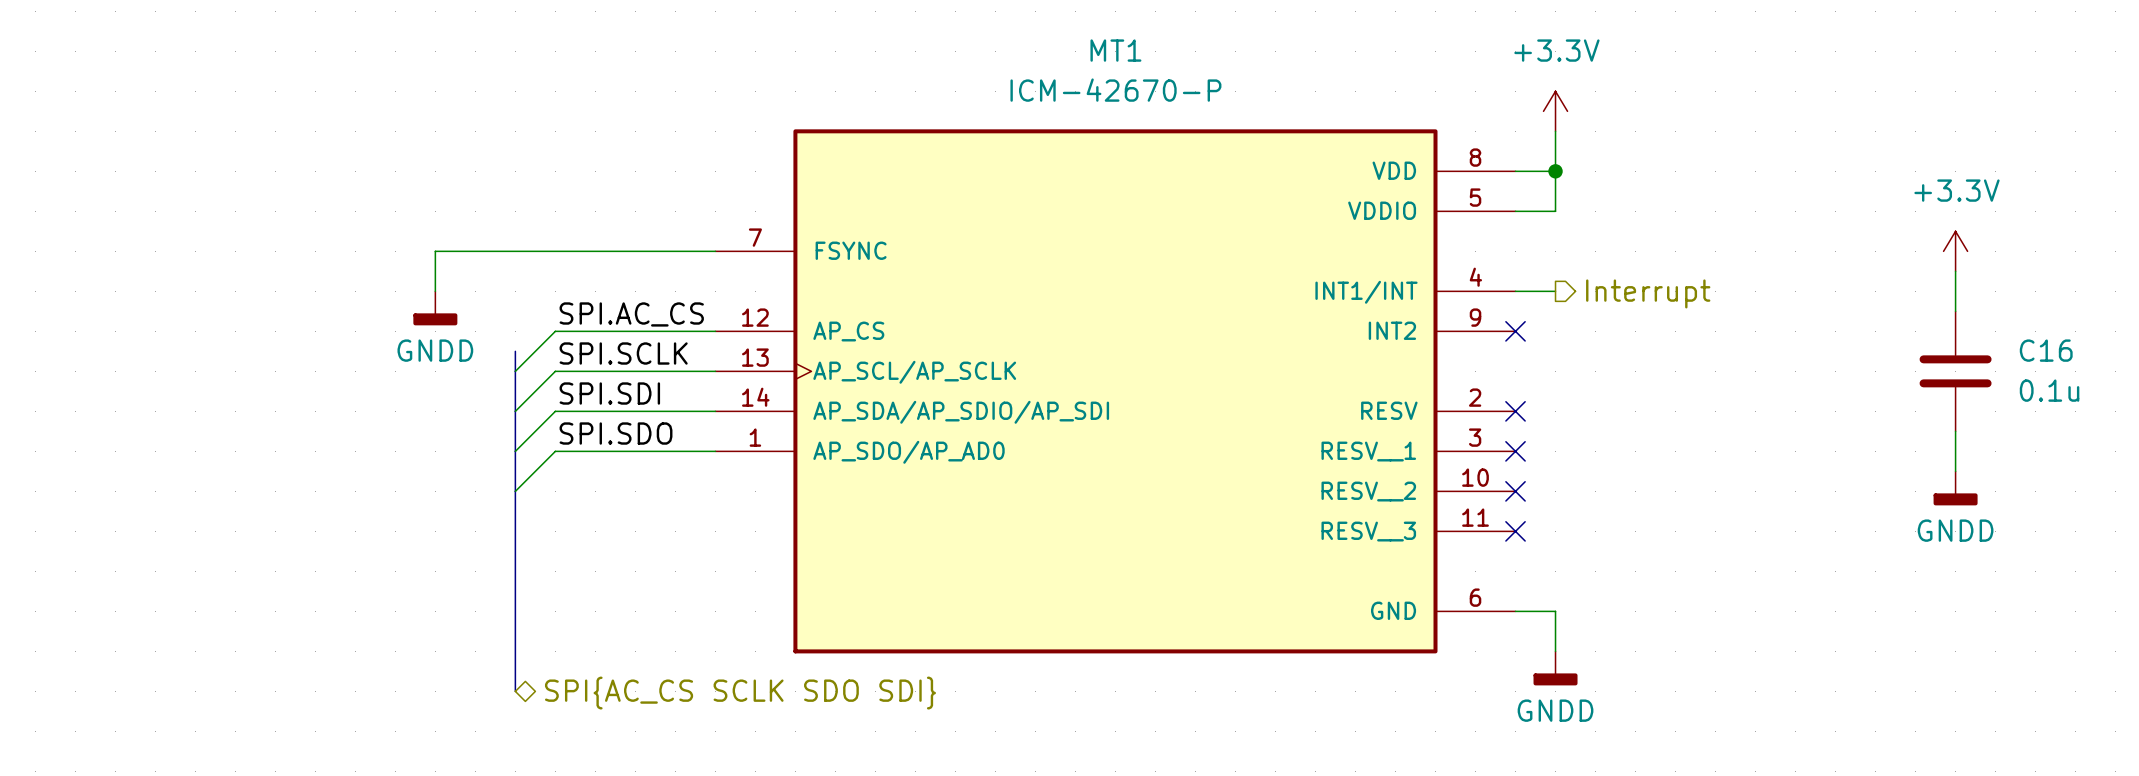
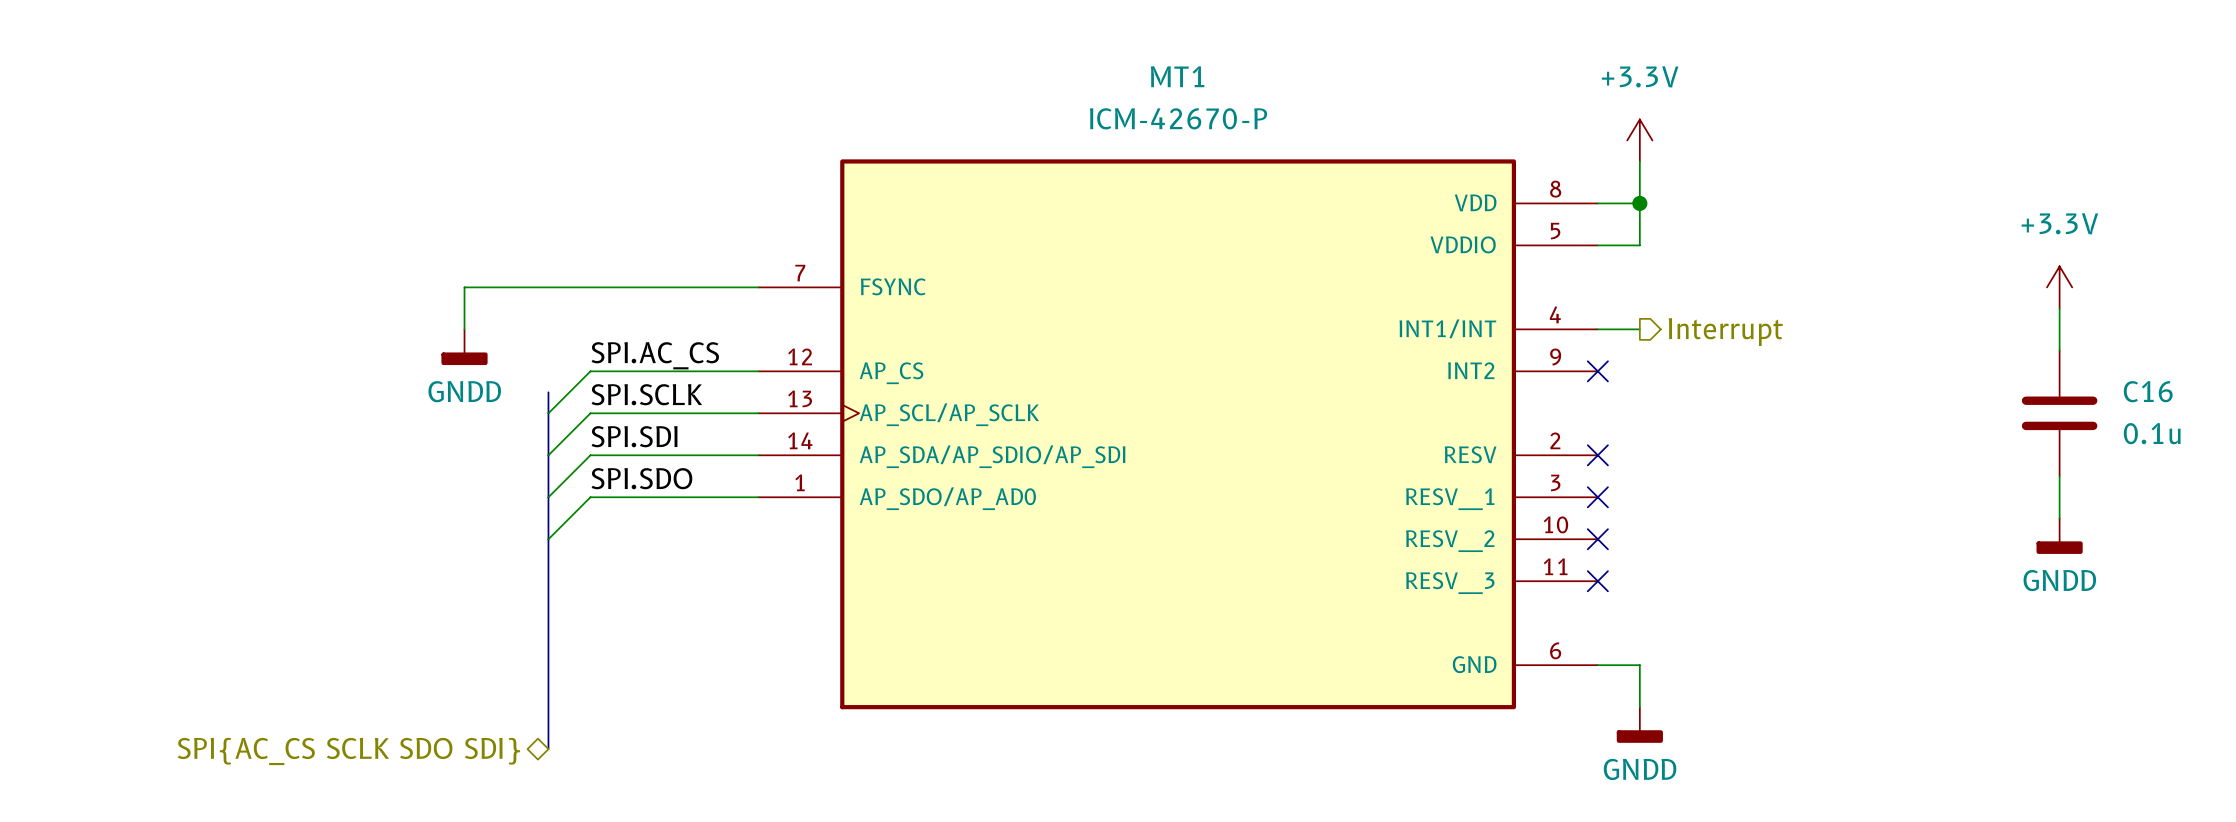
hierarchical label rotation: 0° (740, 693) -> 180° (348, 751)
hierarchical label position: SPI{AC_CS SCLK SDO SDI} (740, 693) -> SPI{AC_CS SCLK SDO SDI} (348, 751)

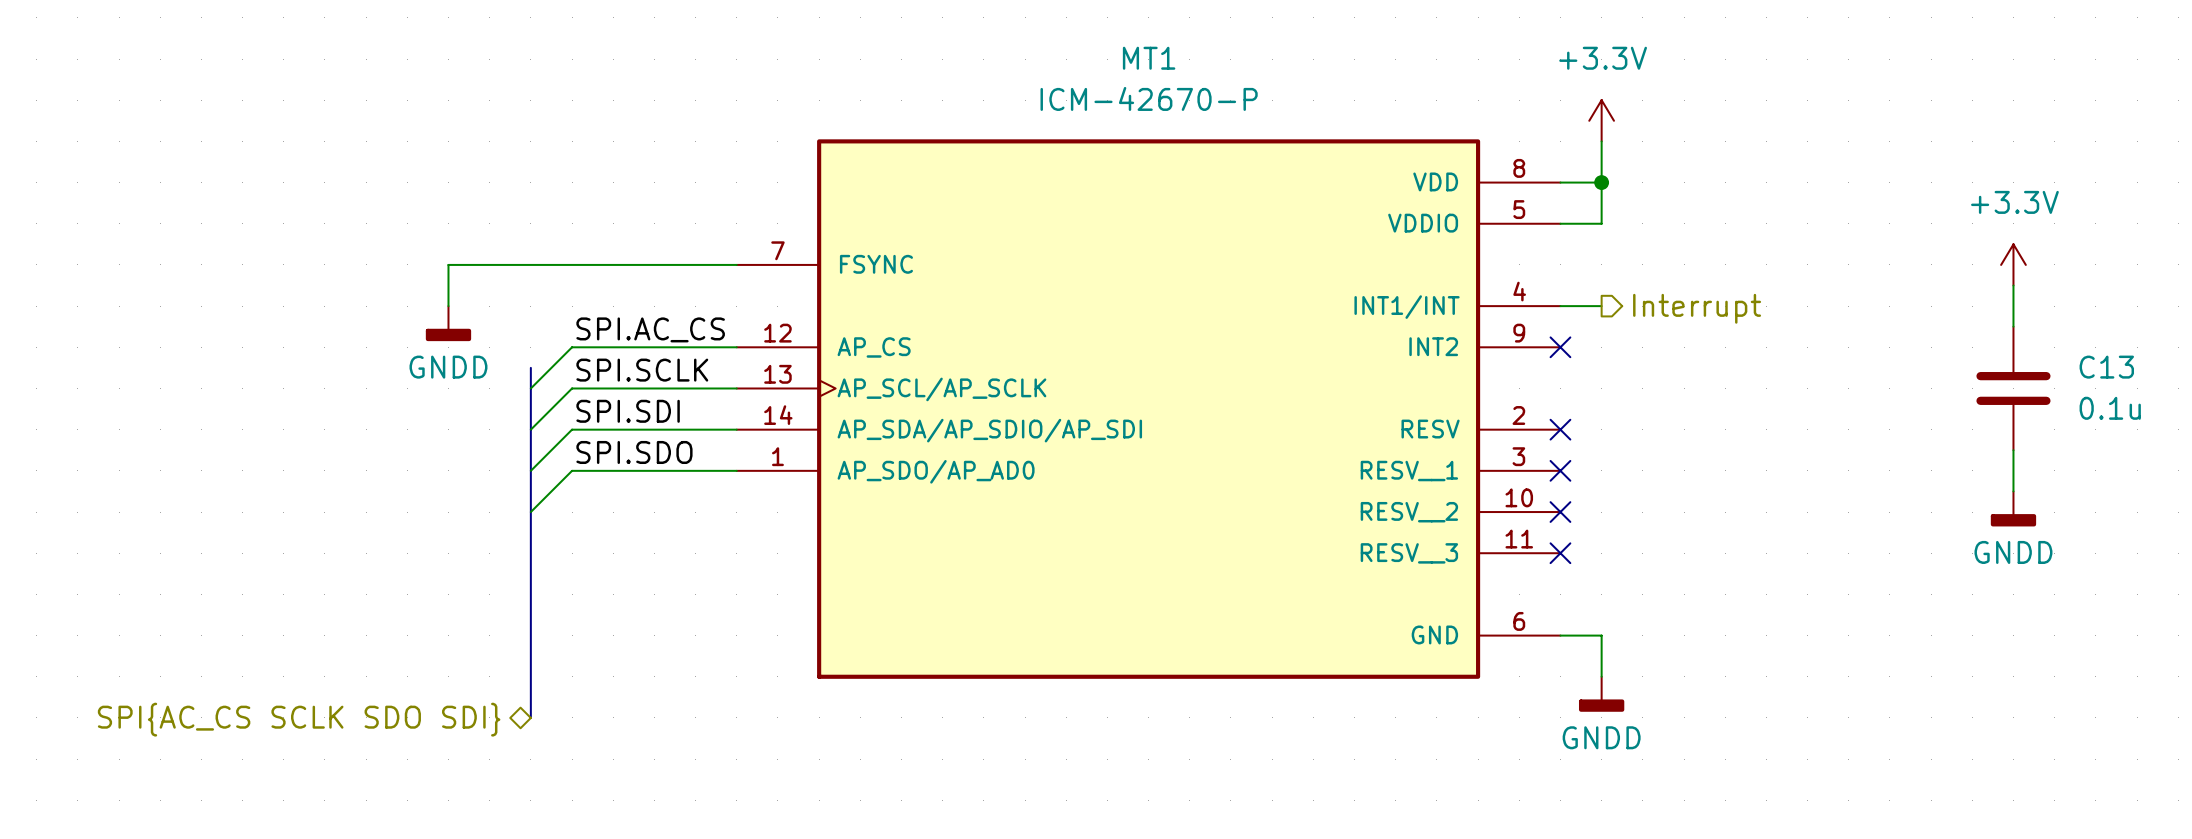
C16 name: C16 (2148, 391) -> C13 (2106, 367)

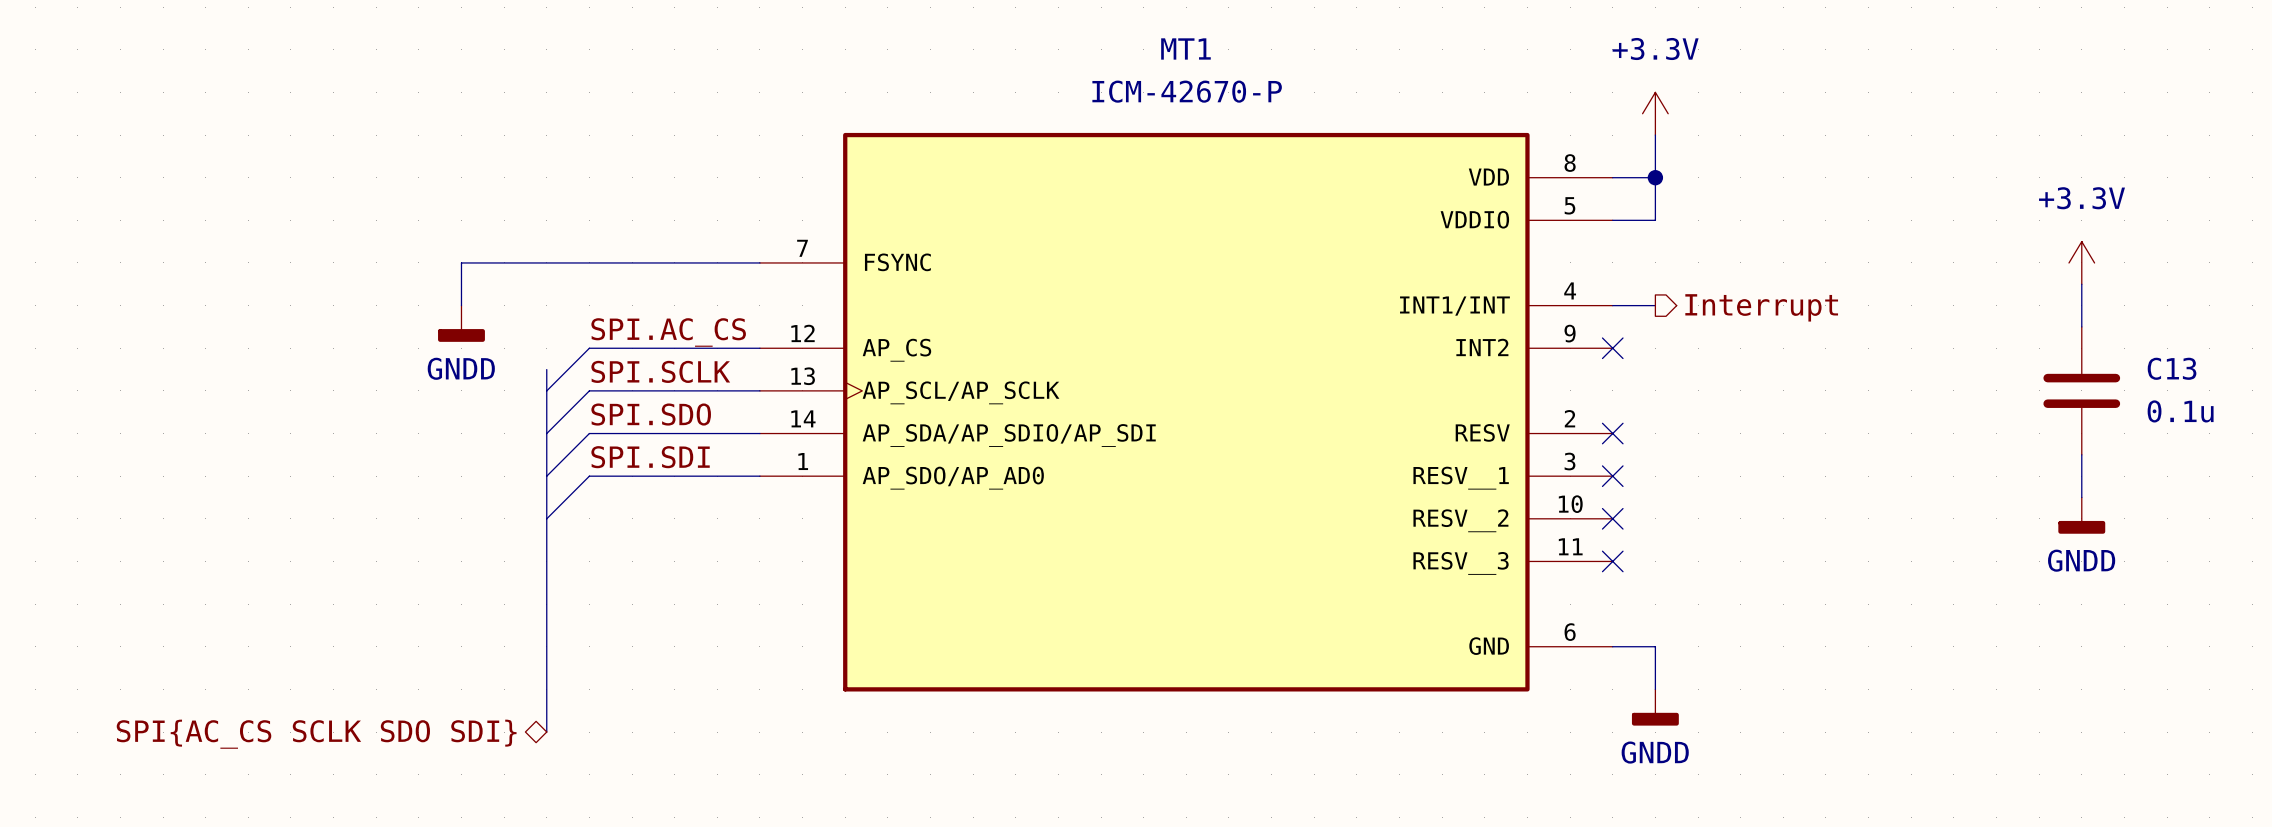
label: SPI.SDI (628, 411) -> SPI.SDO (651, 414)
label: SPI.SDO (634, 452) -> SPI.SDI (650, 457)

